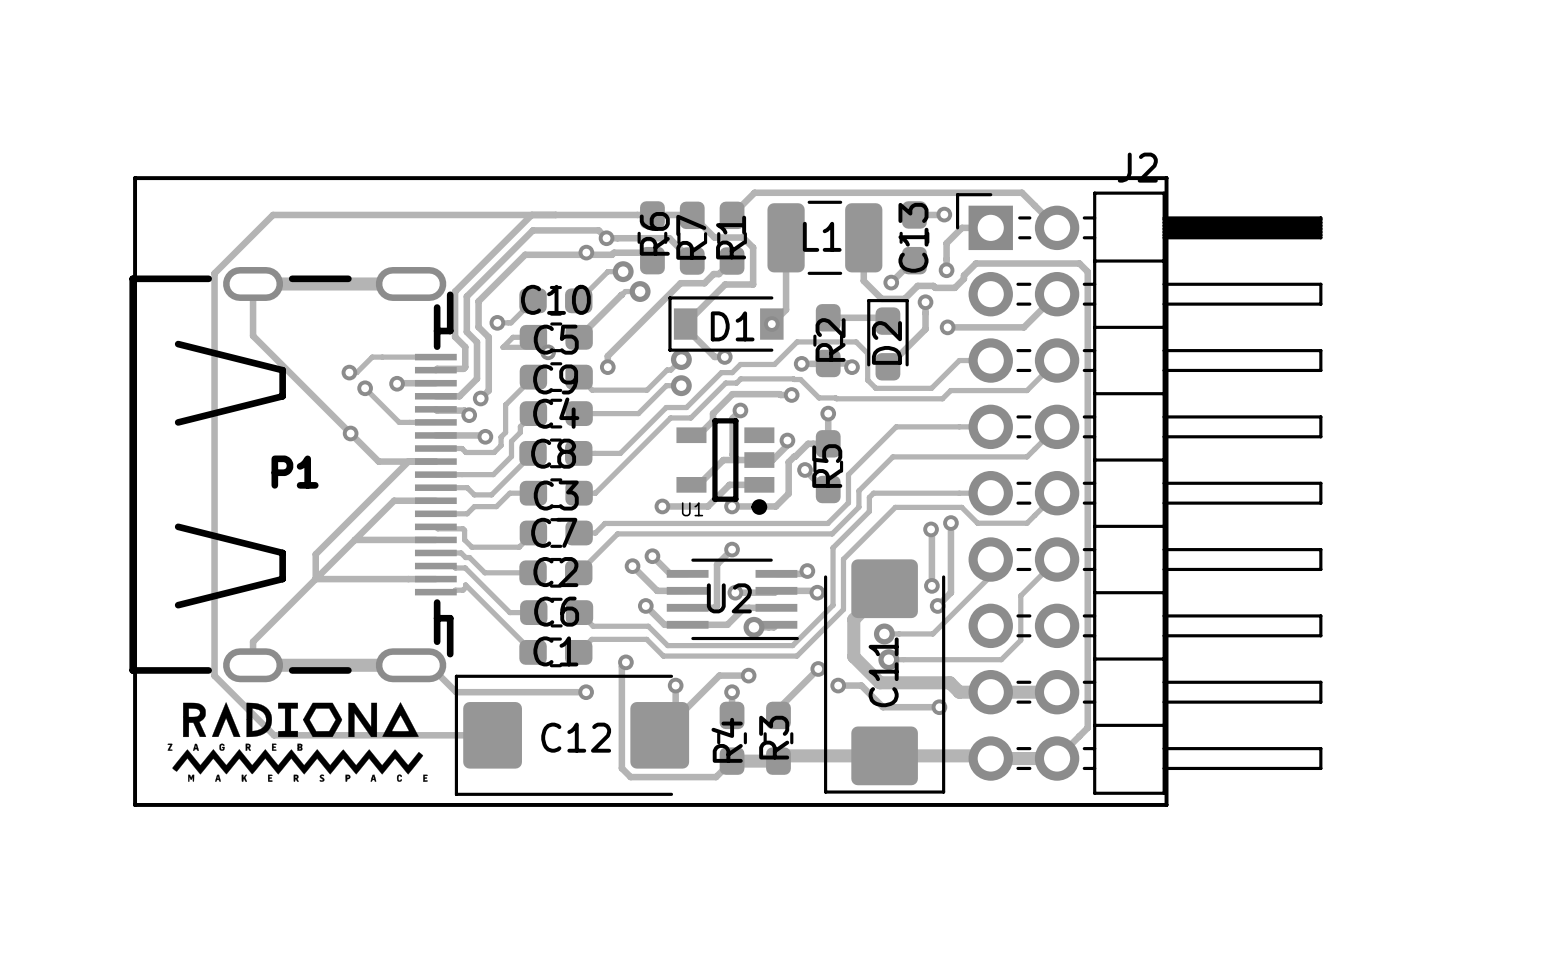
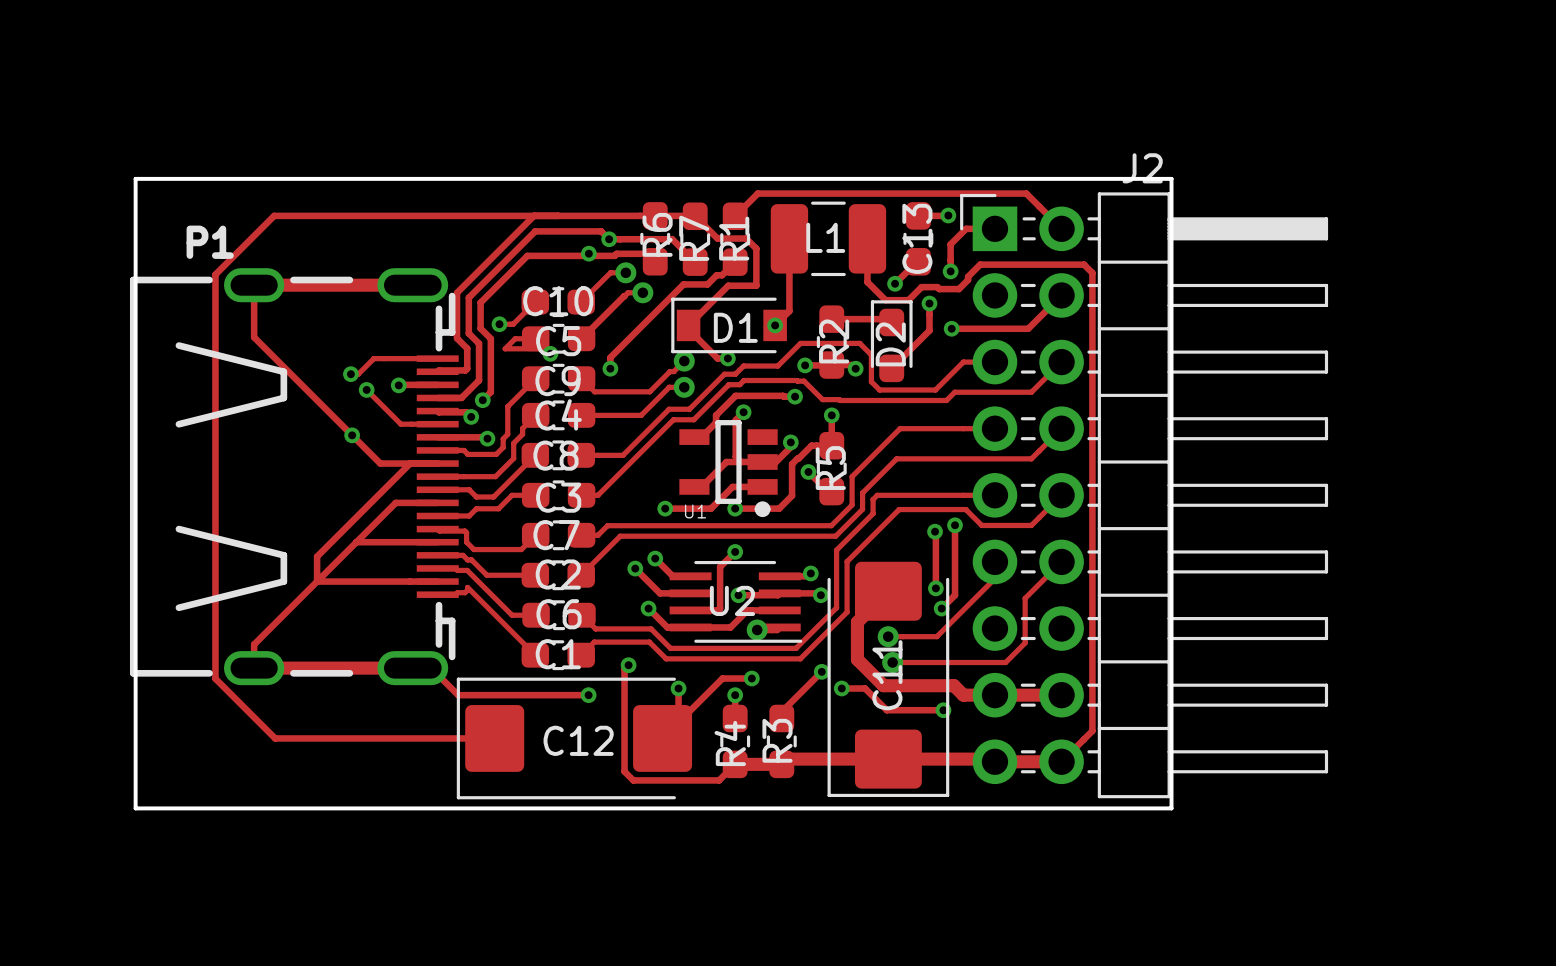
P1 name position: P1 (295, 472) -> P1 (210, 242)
drawing: [167, 702, 428, 782] -> none

